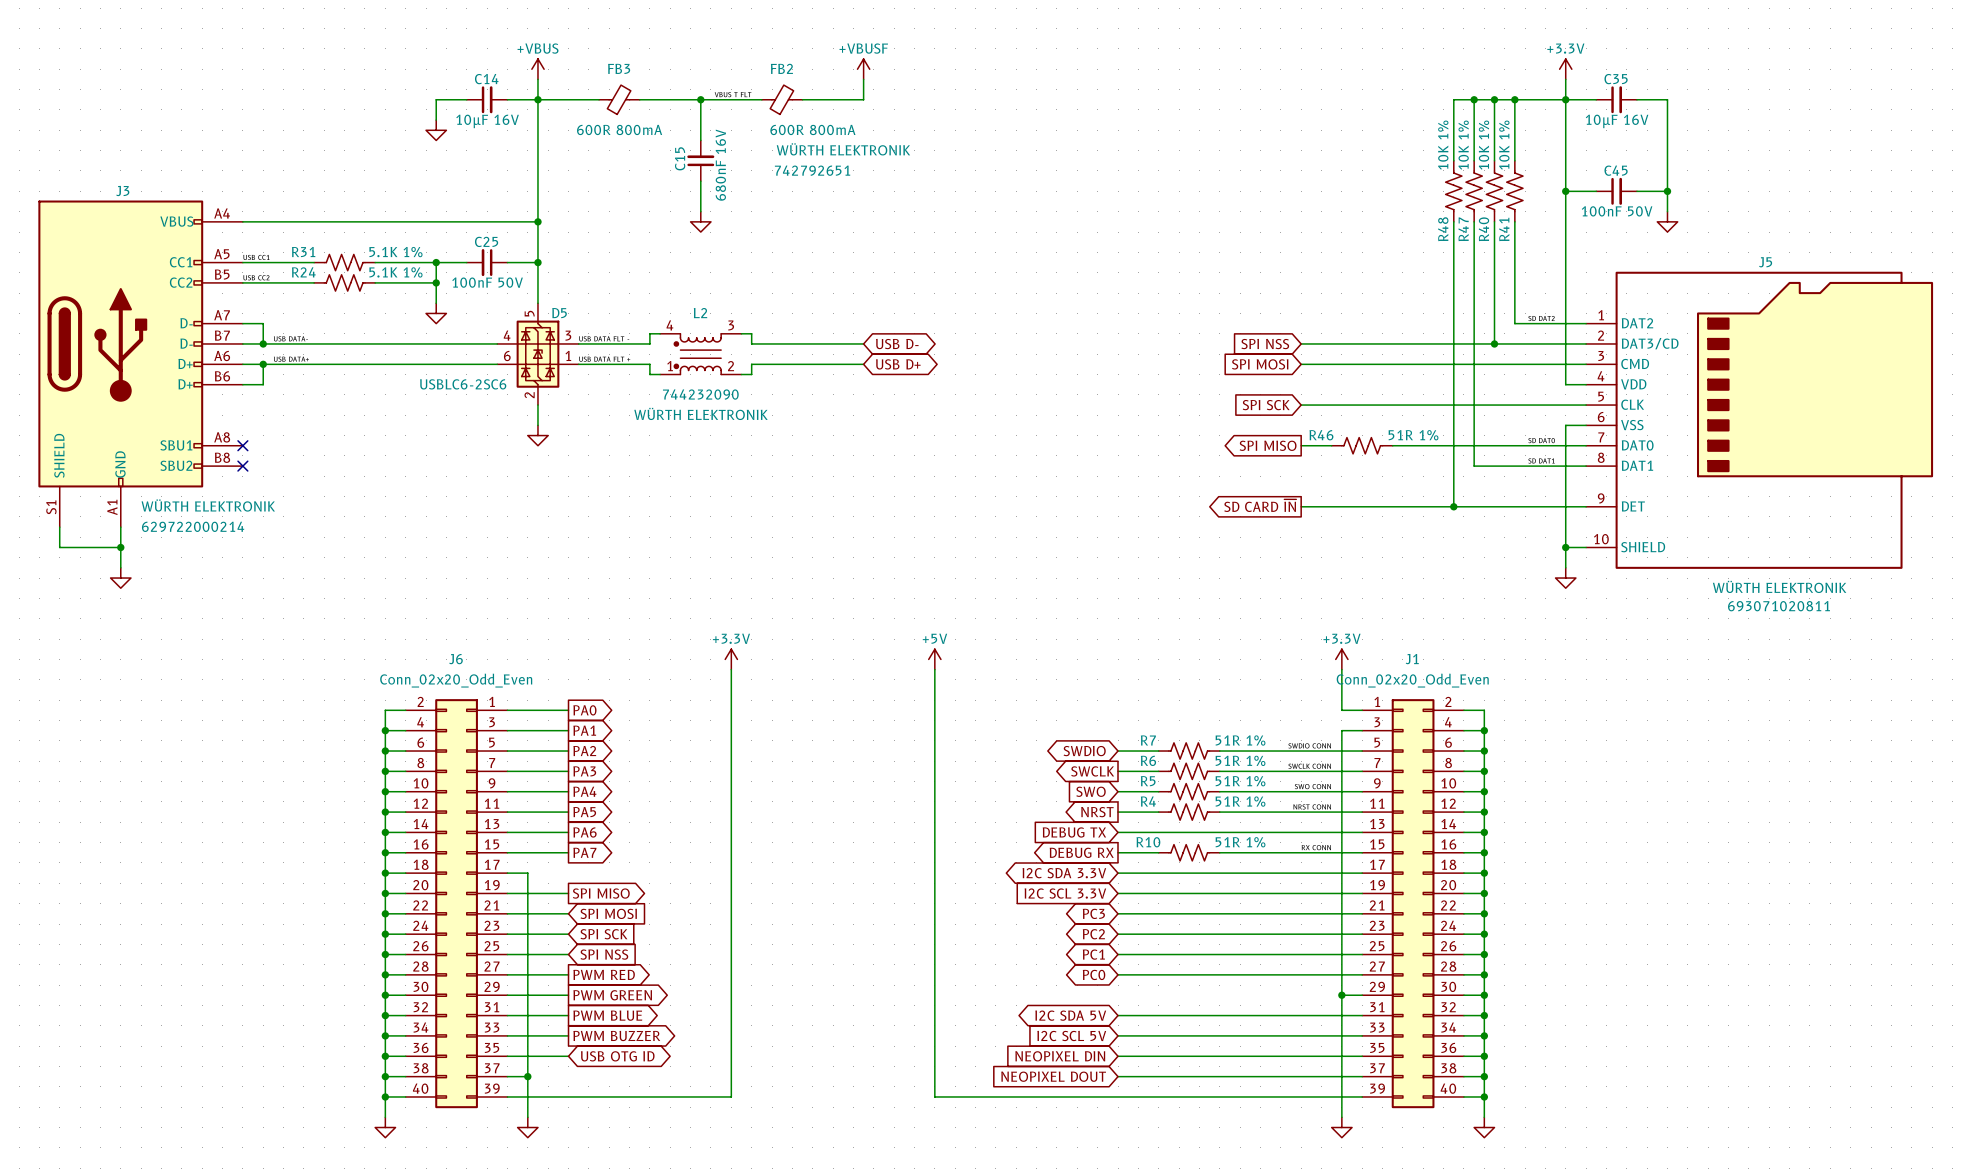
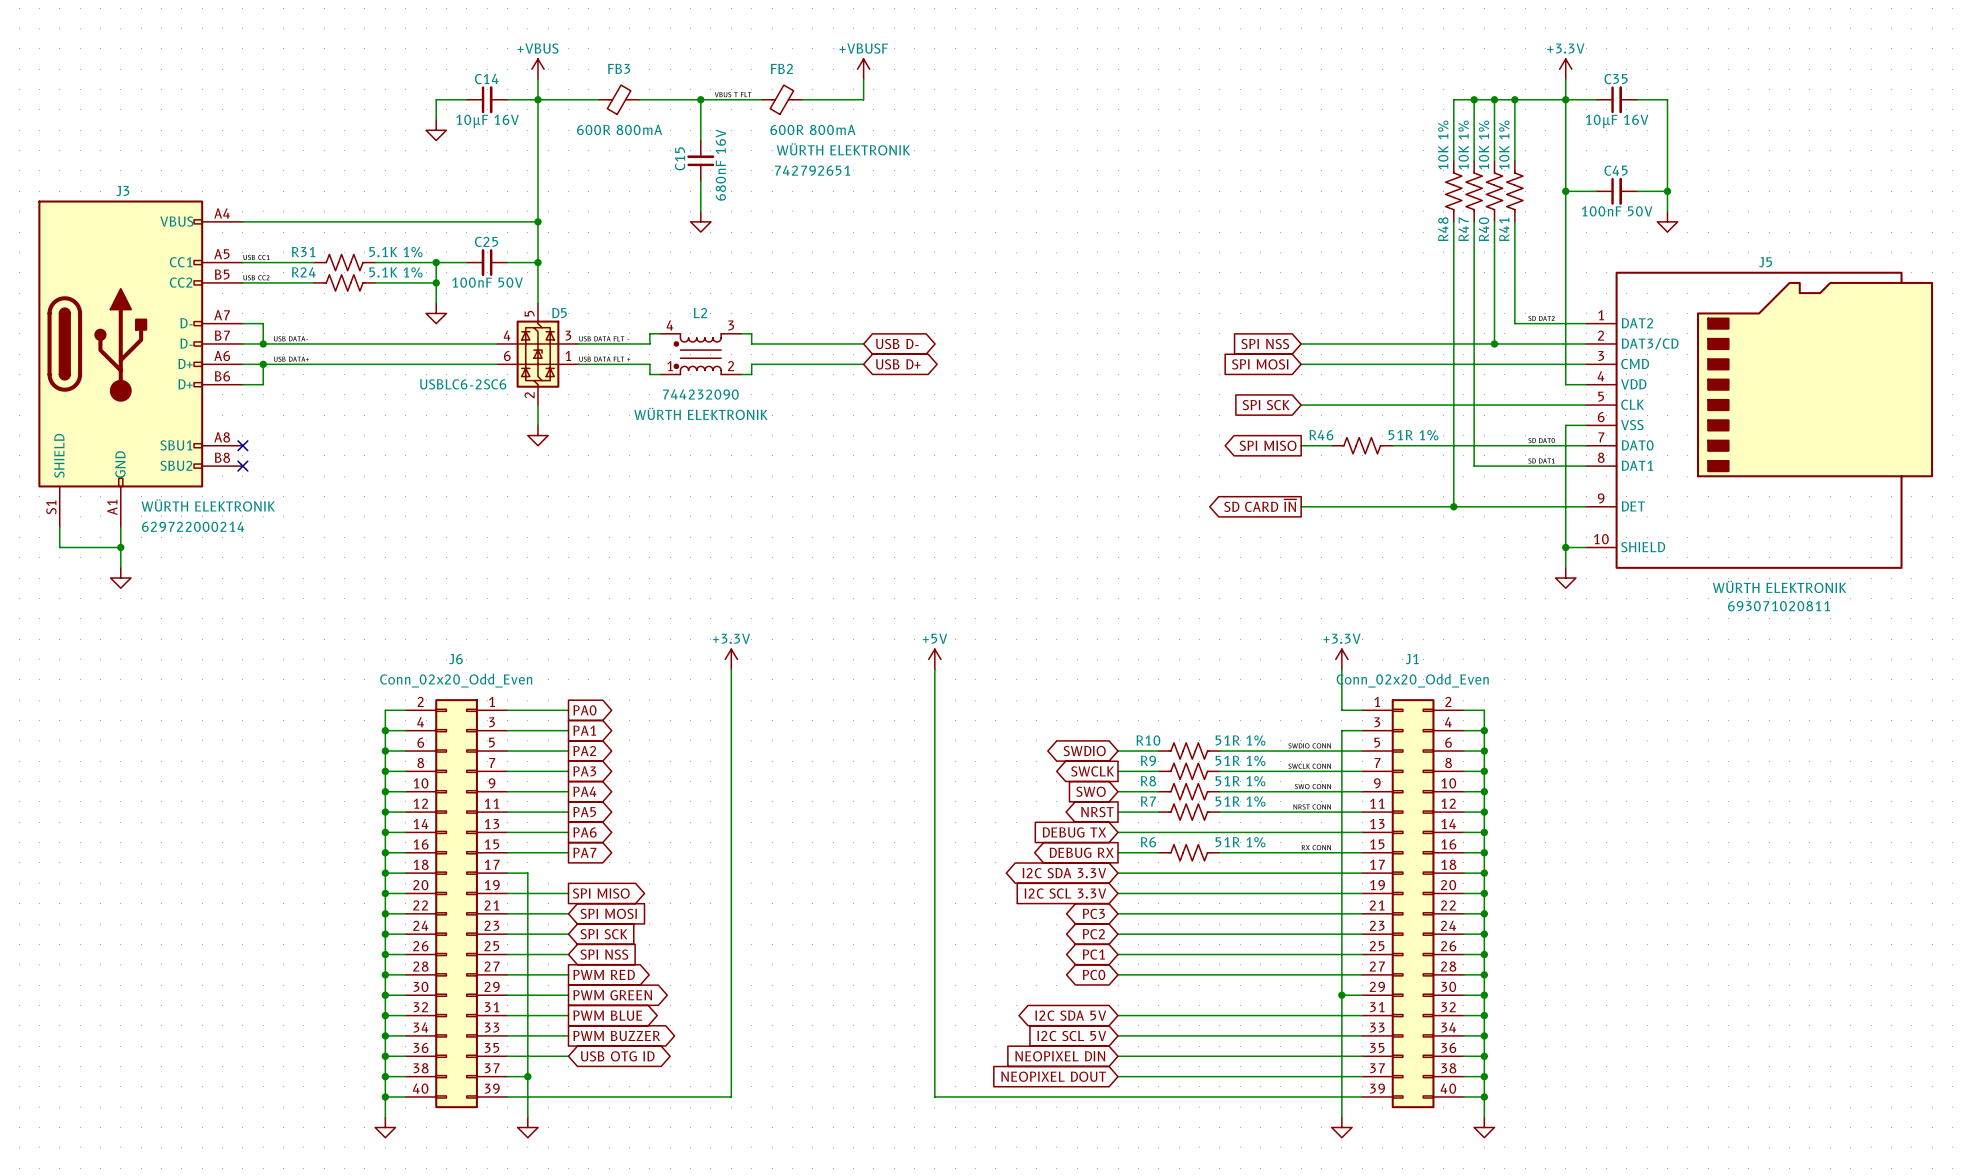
R7 name: R7 (1148, 740) -> R10 (1148, 740)
R6 name: R6 (1148, 760) -> R9 (1148, 760)
R5 name: R5 (1148, 781) -> R8 (1148, 781)
R4 name: R4 (1148, 801) -> R7 (1148, 801)
R10 name: R10 (1148, 842) -> R6 (1148, 842)

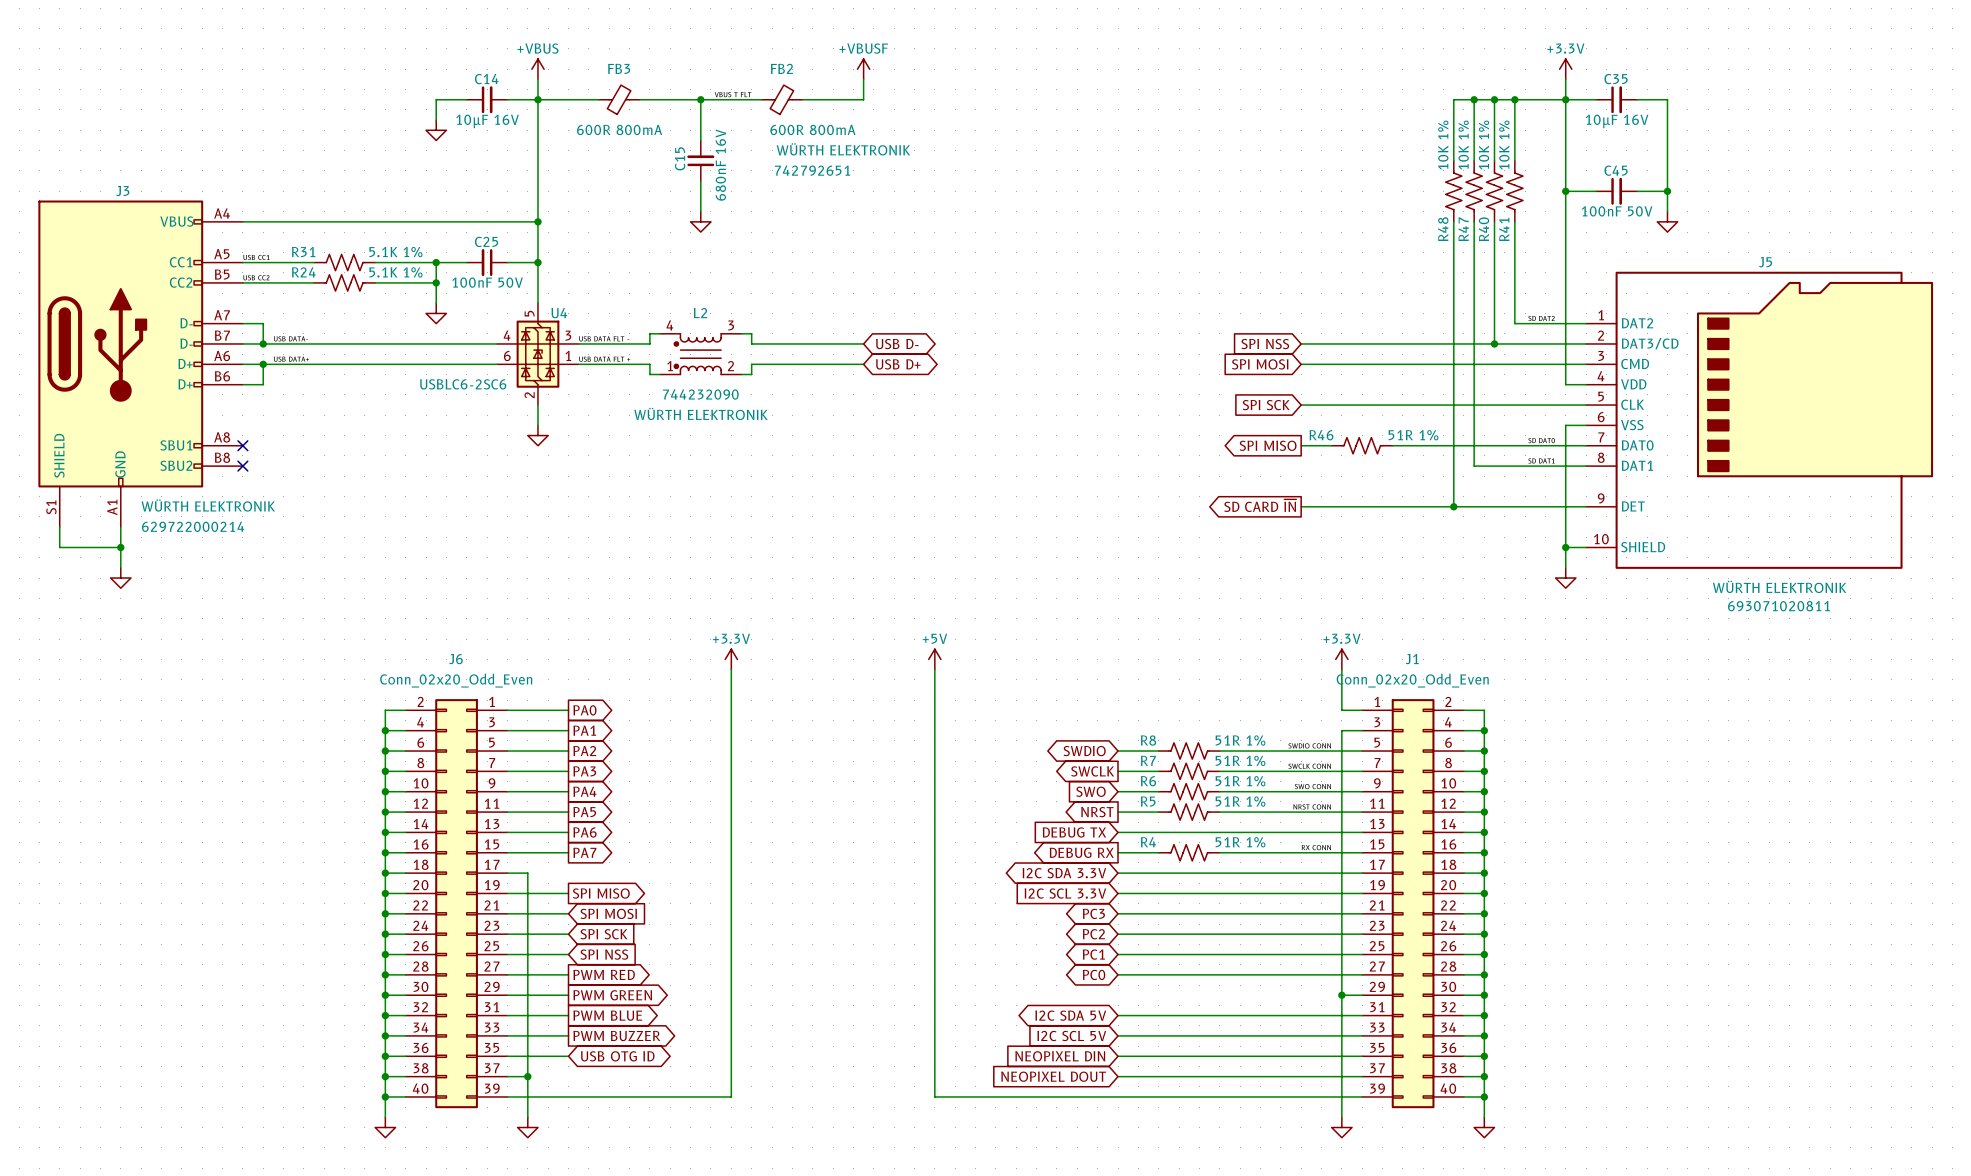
D5 name: D5 (559, 313) -> U4 (559, 313)
R10 name: R10 (1148, 740) -> R8 (1148, 740)
R9 name: R9 (1148, 760) -> R7 (1148, 760)
R8 name: R8 (1148, 781) -> R6 (1148, 781)
R7 name: R7 (1148, 801) -> R5 (1148, 801)
R6 name: R6 (1148, 842) -> R4 (1148, 842)

